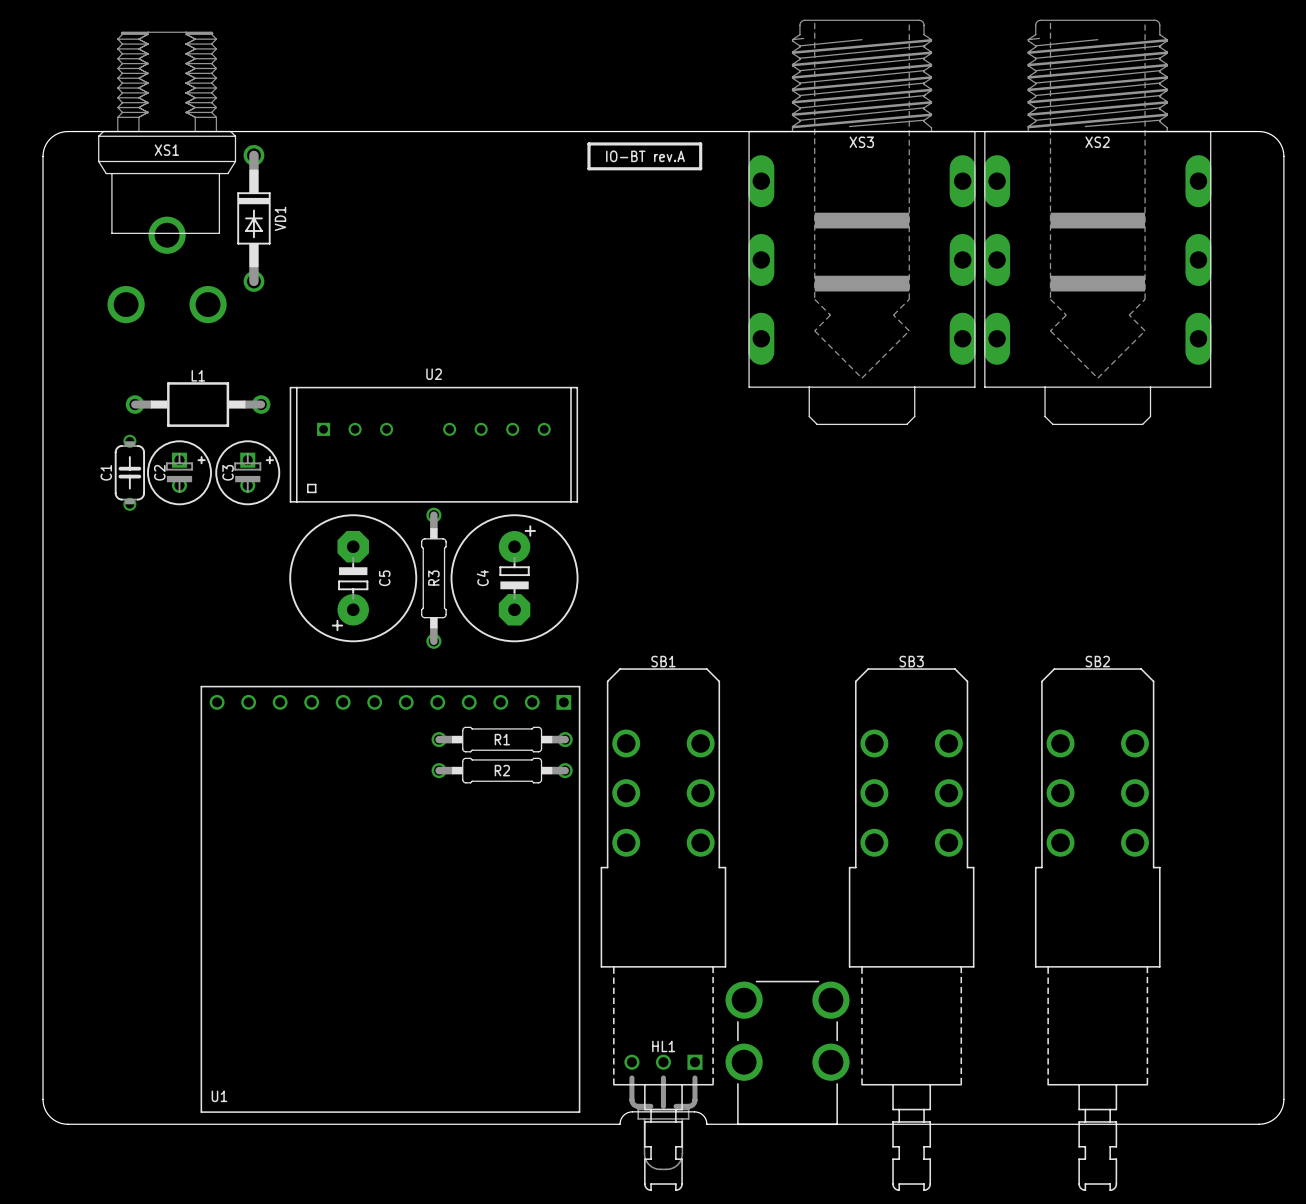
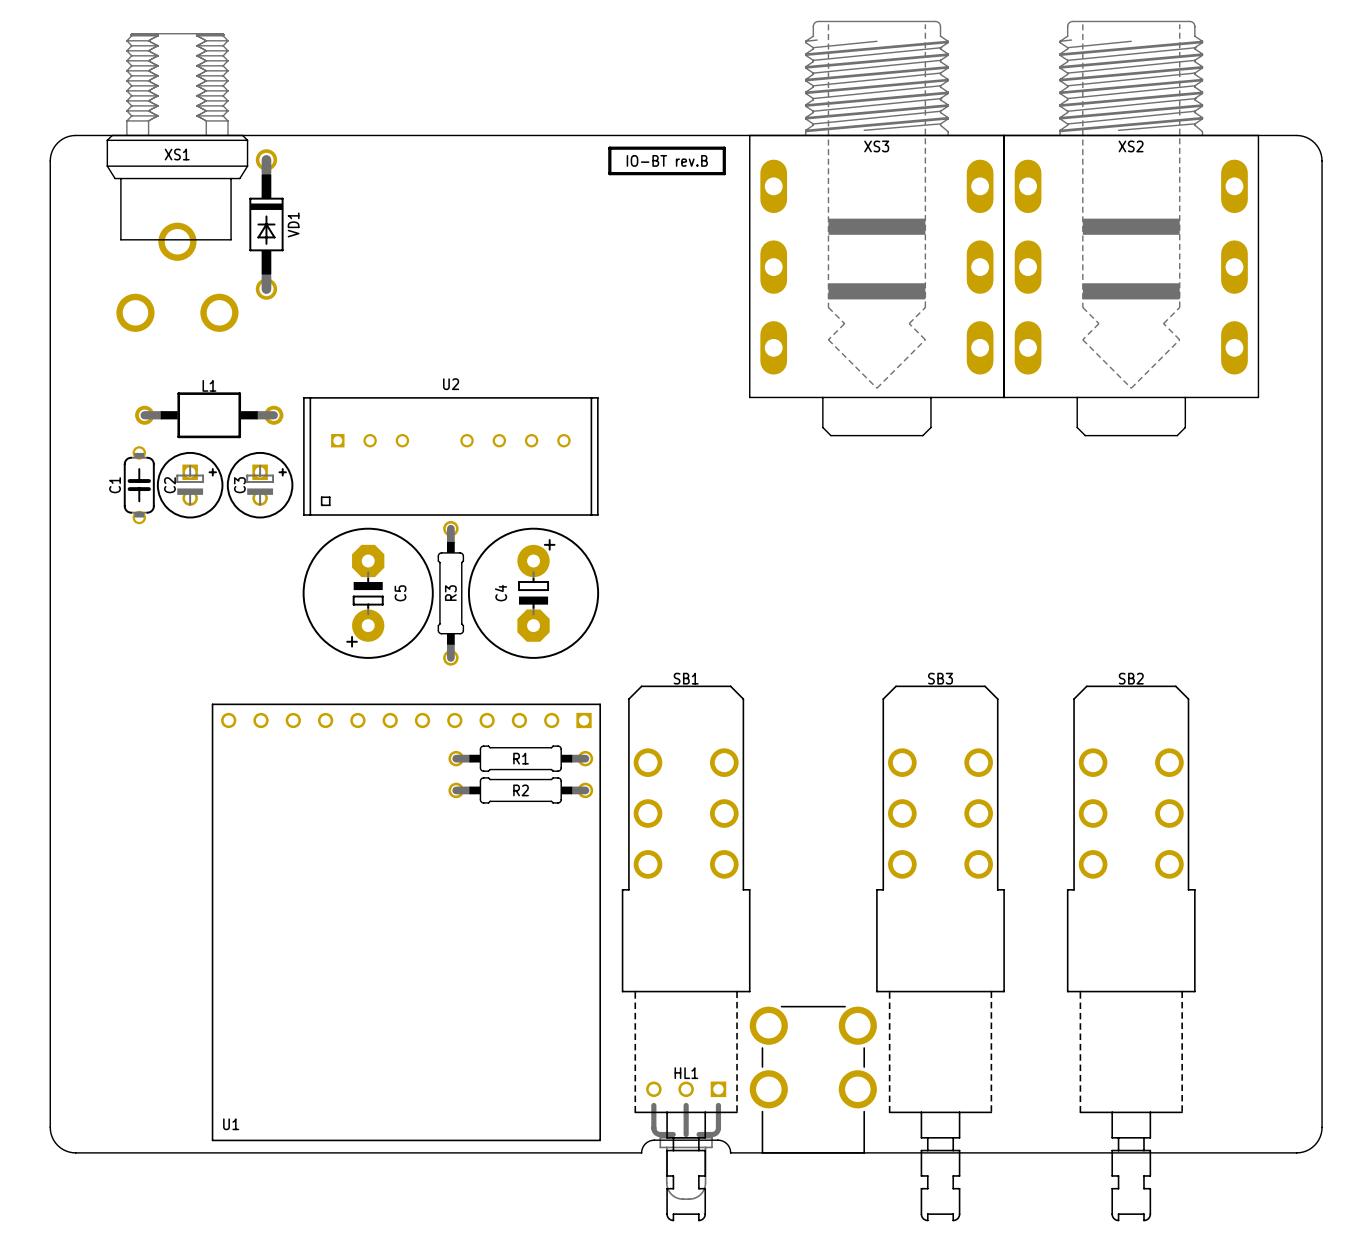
XS3 footprint: [748, 19, 976, 426] -> [749, 20, 1005, 437]
XS2 footprint: [984, 19, 1212, 426] -> [1003, 20, 1260, 437]
drawing shape: [606, 150, 685, 163] -> [626, 154, 708, 167]

